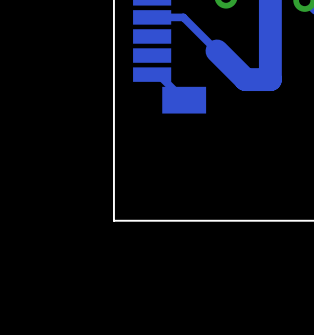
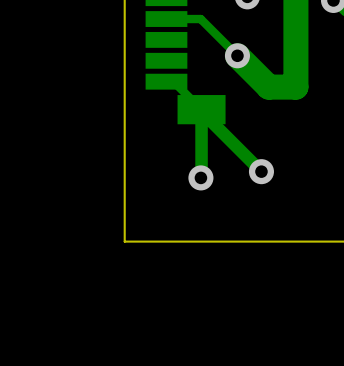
via: none -> (237, 55)
track: none -> (201, 109) (200, 177)
track: none -> (201, 111) (261, 171)
via: none -> (261, 171)
via: none -> (200, 177)

